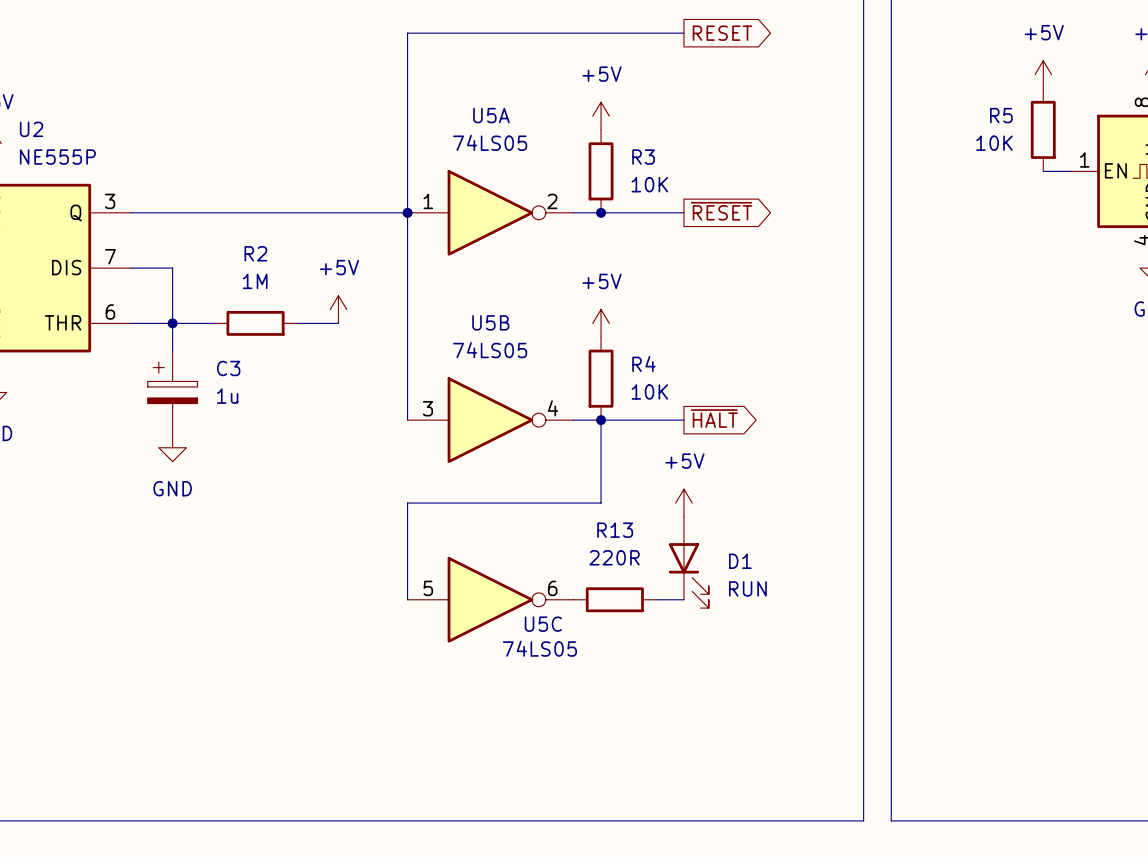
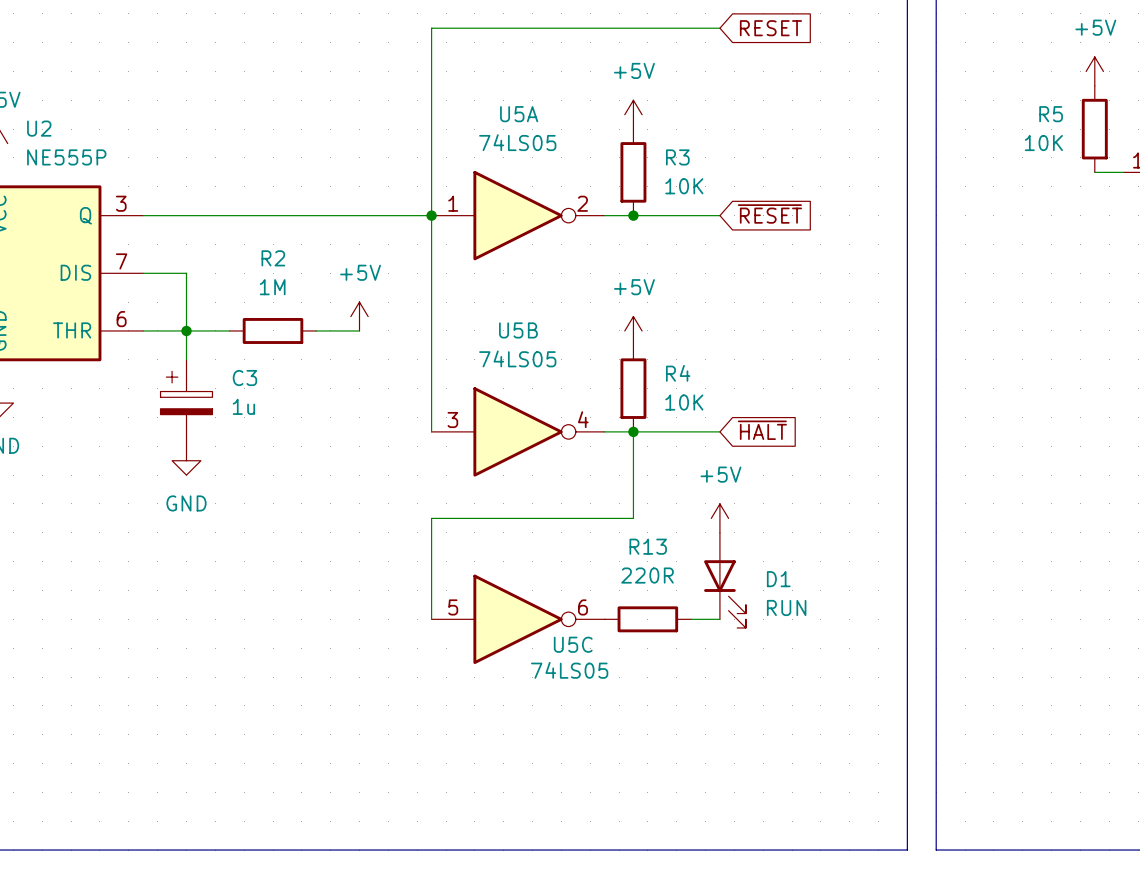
global label shape: output (722, 33) -> input (770, 28)
global label shape: output (721, 211) -> input (769, 213)
global label shape: output (714, 418) -> input (762, 430)

